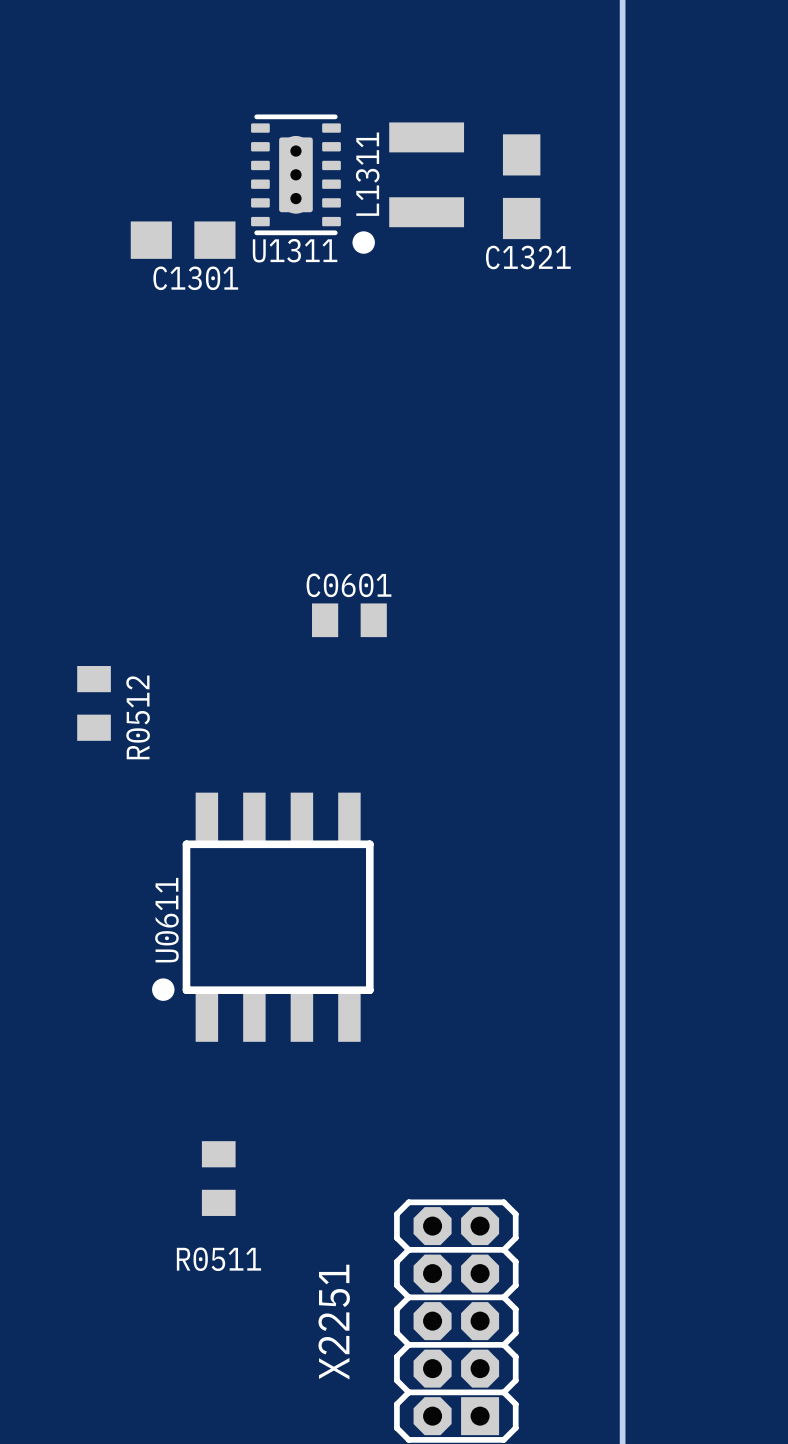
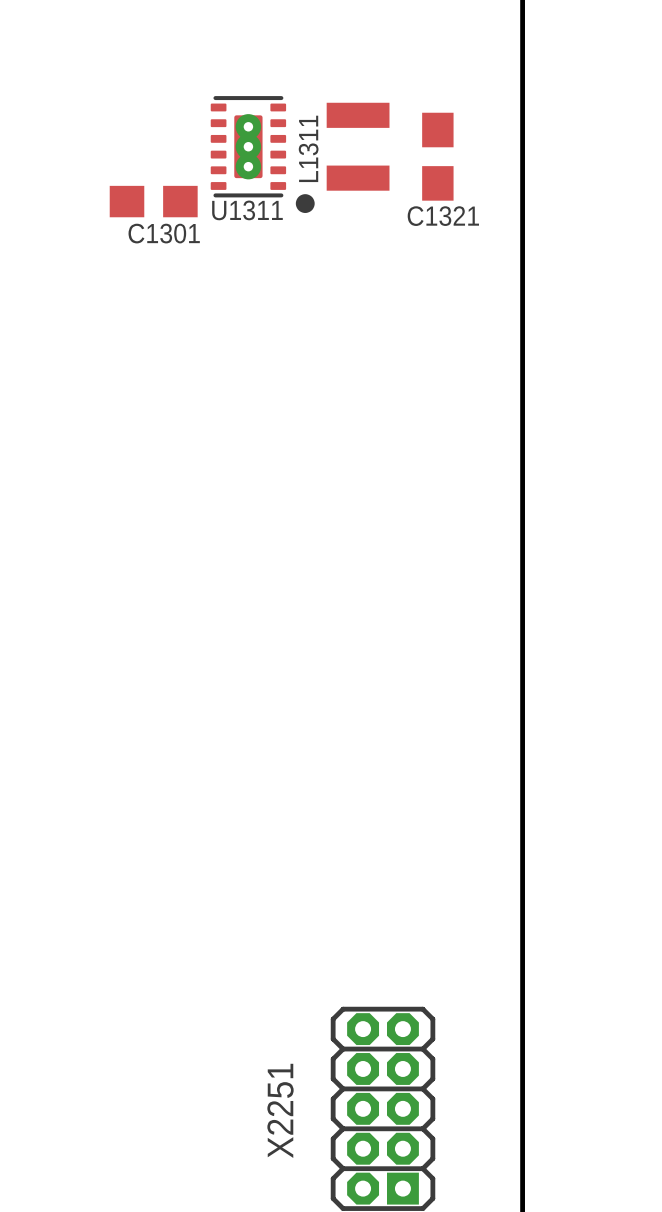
C0601: (349, 620) -> none
R0512: (94, 703) -> none
U0611: (262, 917) -> none
R0511: (218, 1178) -> none

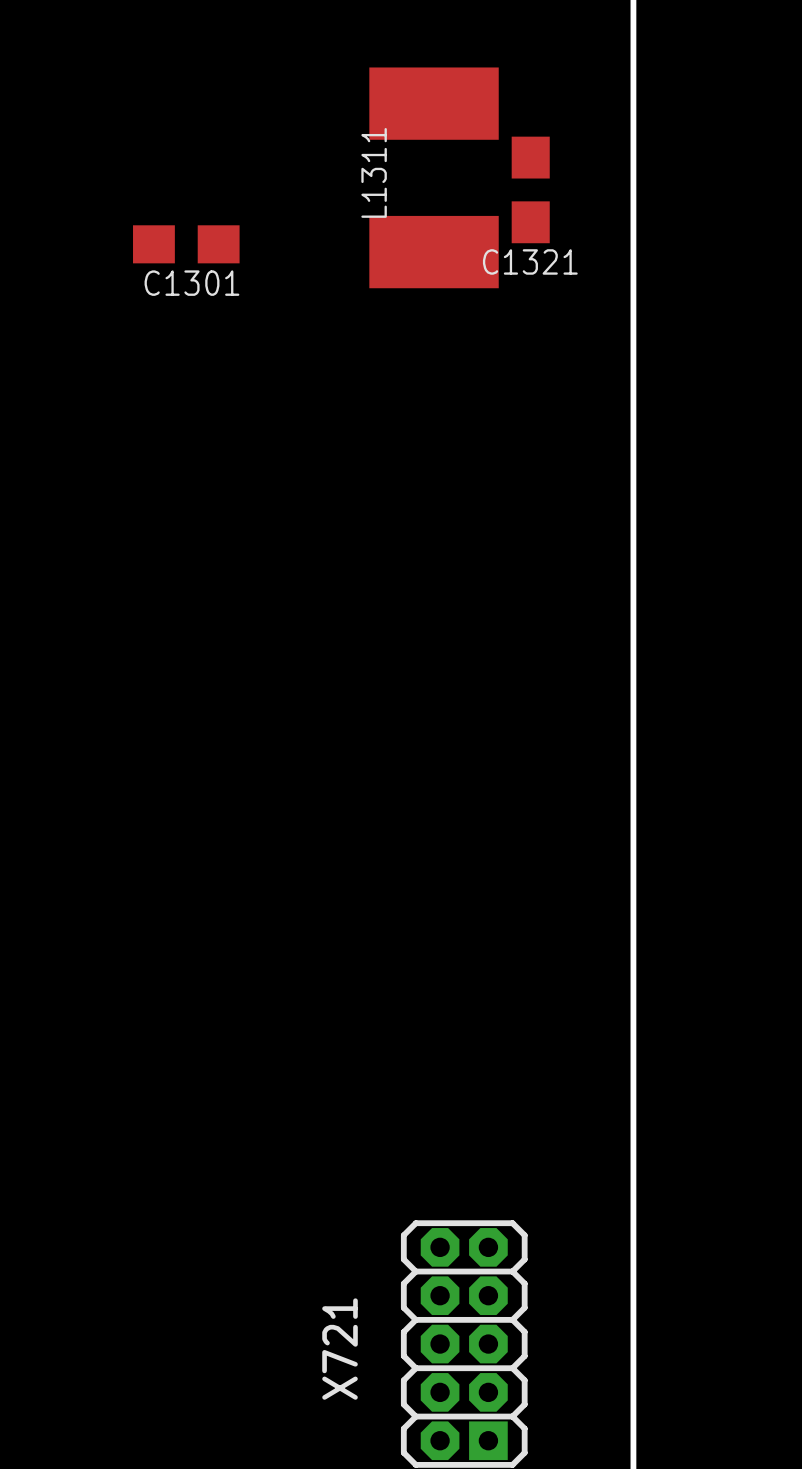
L1311 footprint: [326, 102, 390, 191] -> [369, 67, 499, 289]
U1311: (262, 154) -> none
X2251 name: X2251 (280, 1110) -> X721 (340, 1349)

